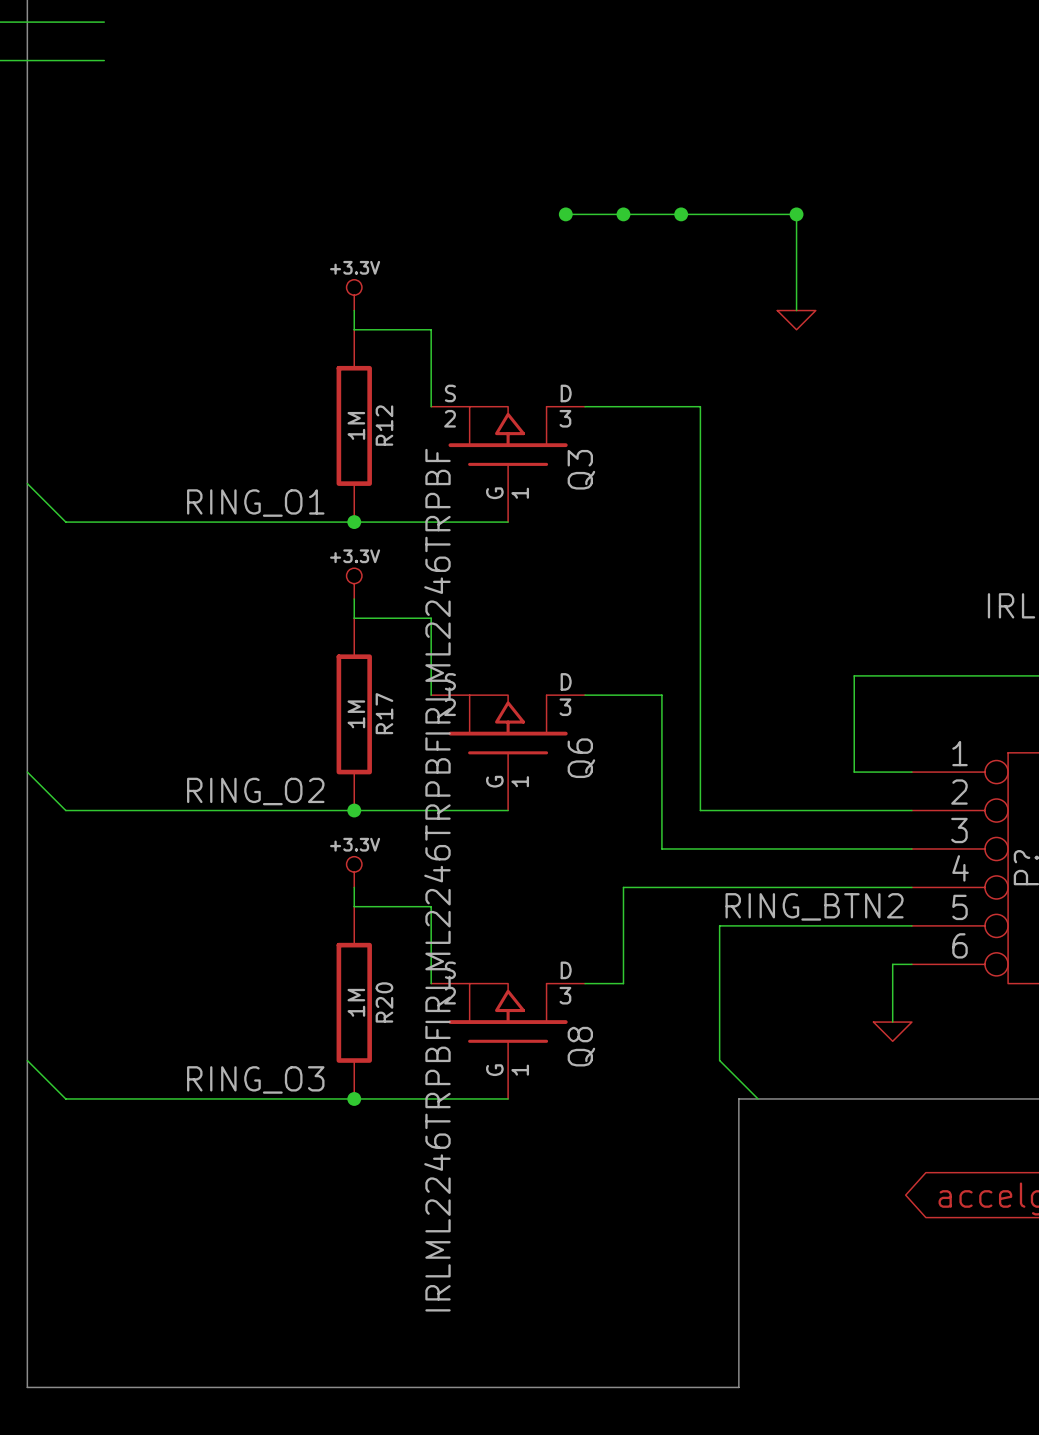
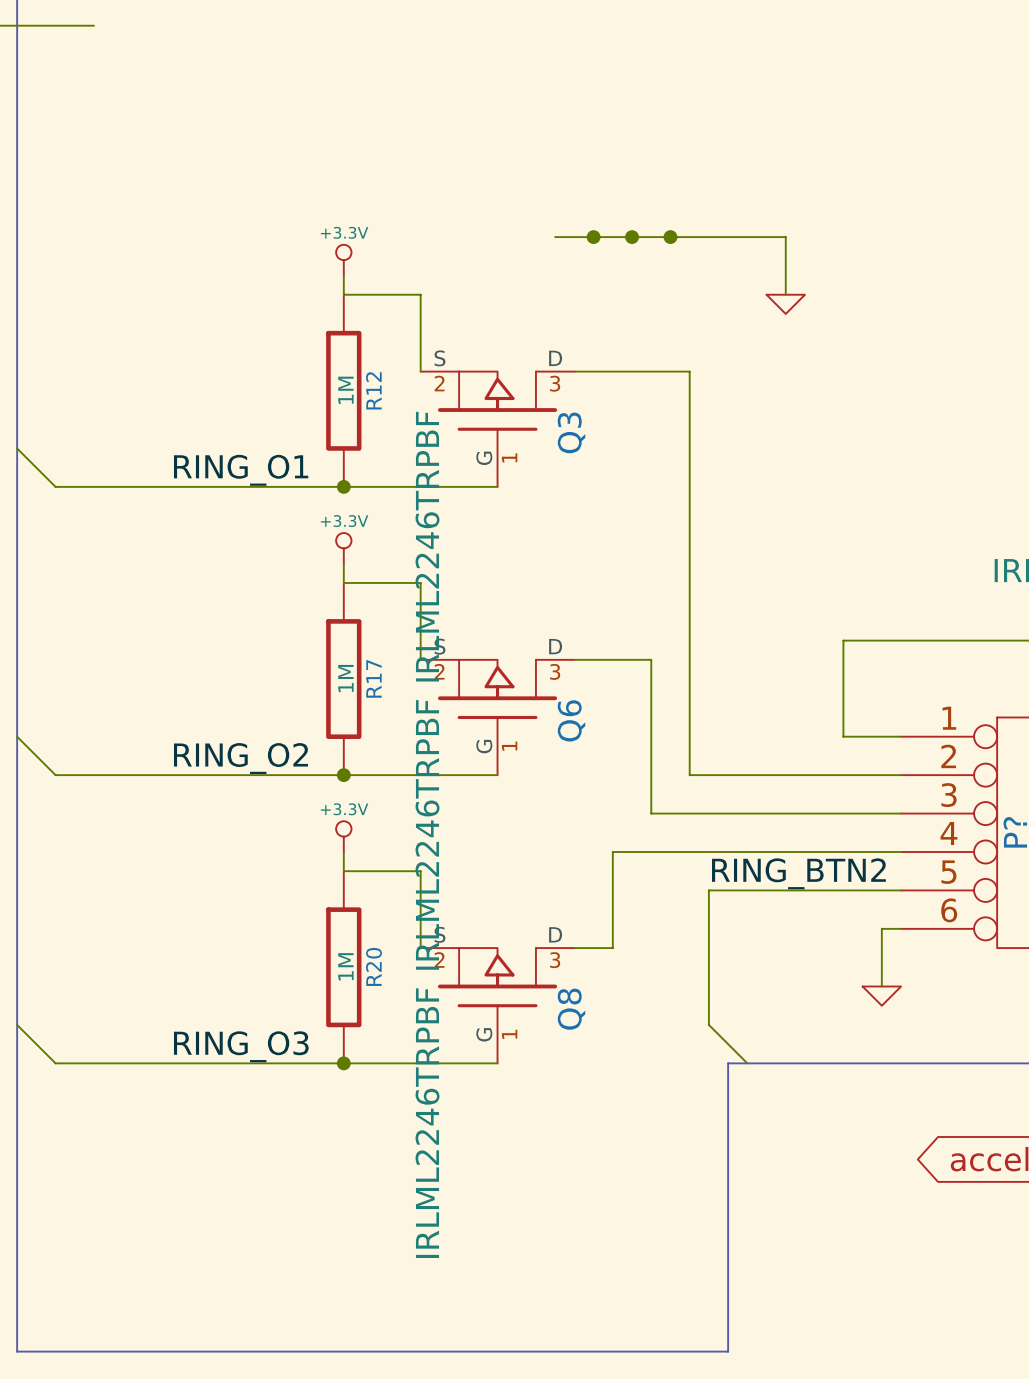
wire: (565, 214) (796, 214) (796, 272) -> (555, 237) (785, 237)
junction: (565, 214) -> none
junction: (623, 214) -> none
junction: (681, 214) -> none
junction: (796, 214) -> none
junction: none -> (593, 237)
junction: none -> (632, 237)
junction: none -> (670, 237)
wire: none -> (785, 275) (785, 294)
power symbol position: (796, 320) -> (785, 304)

